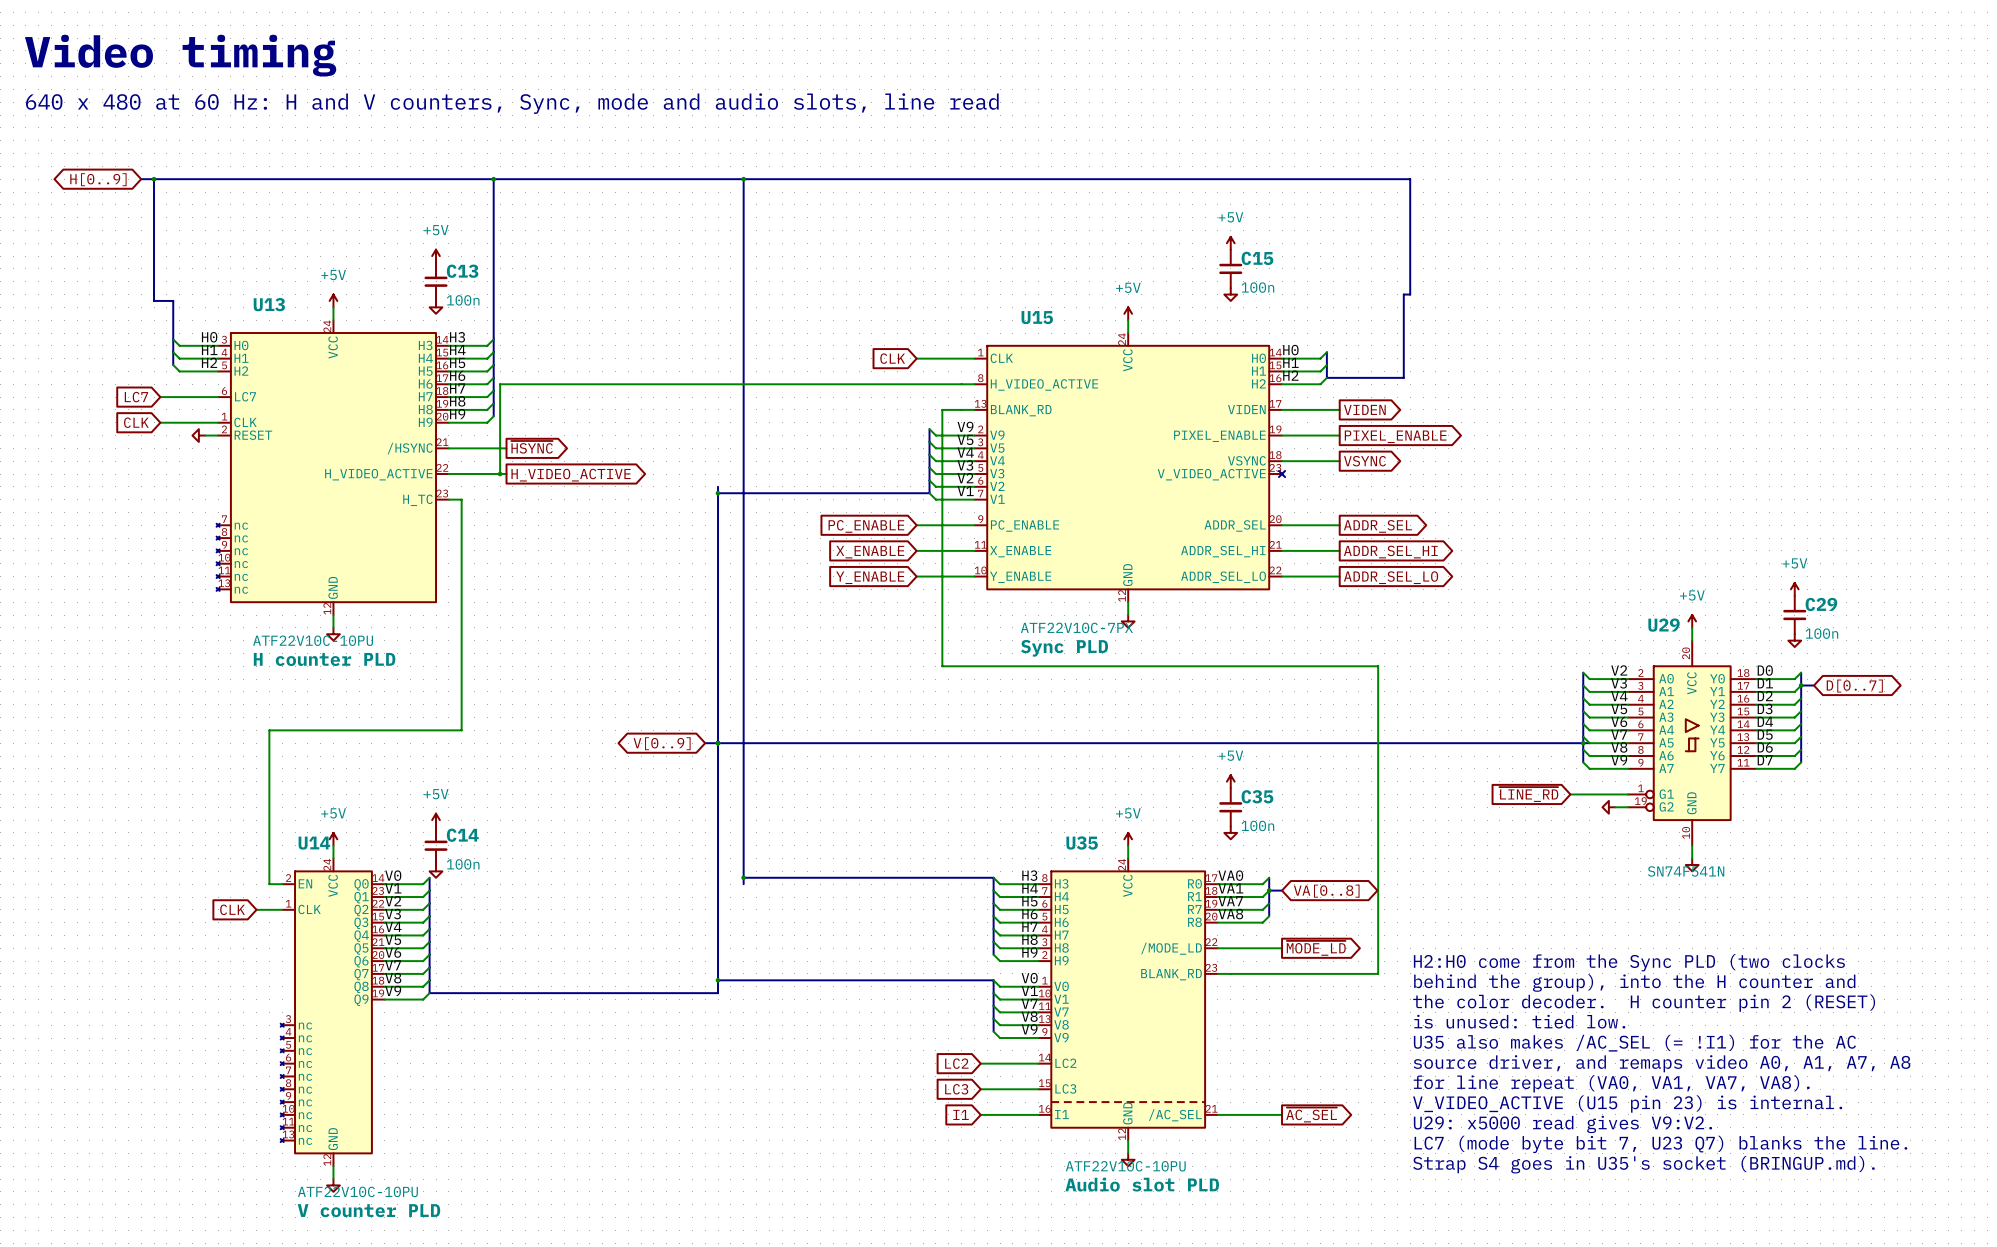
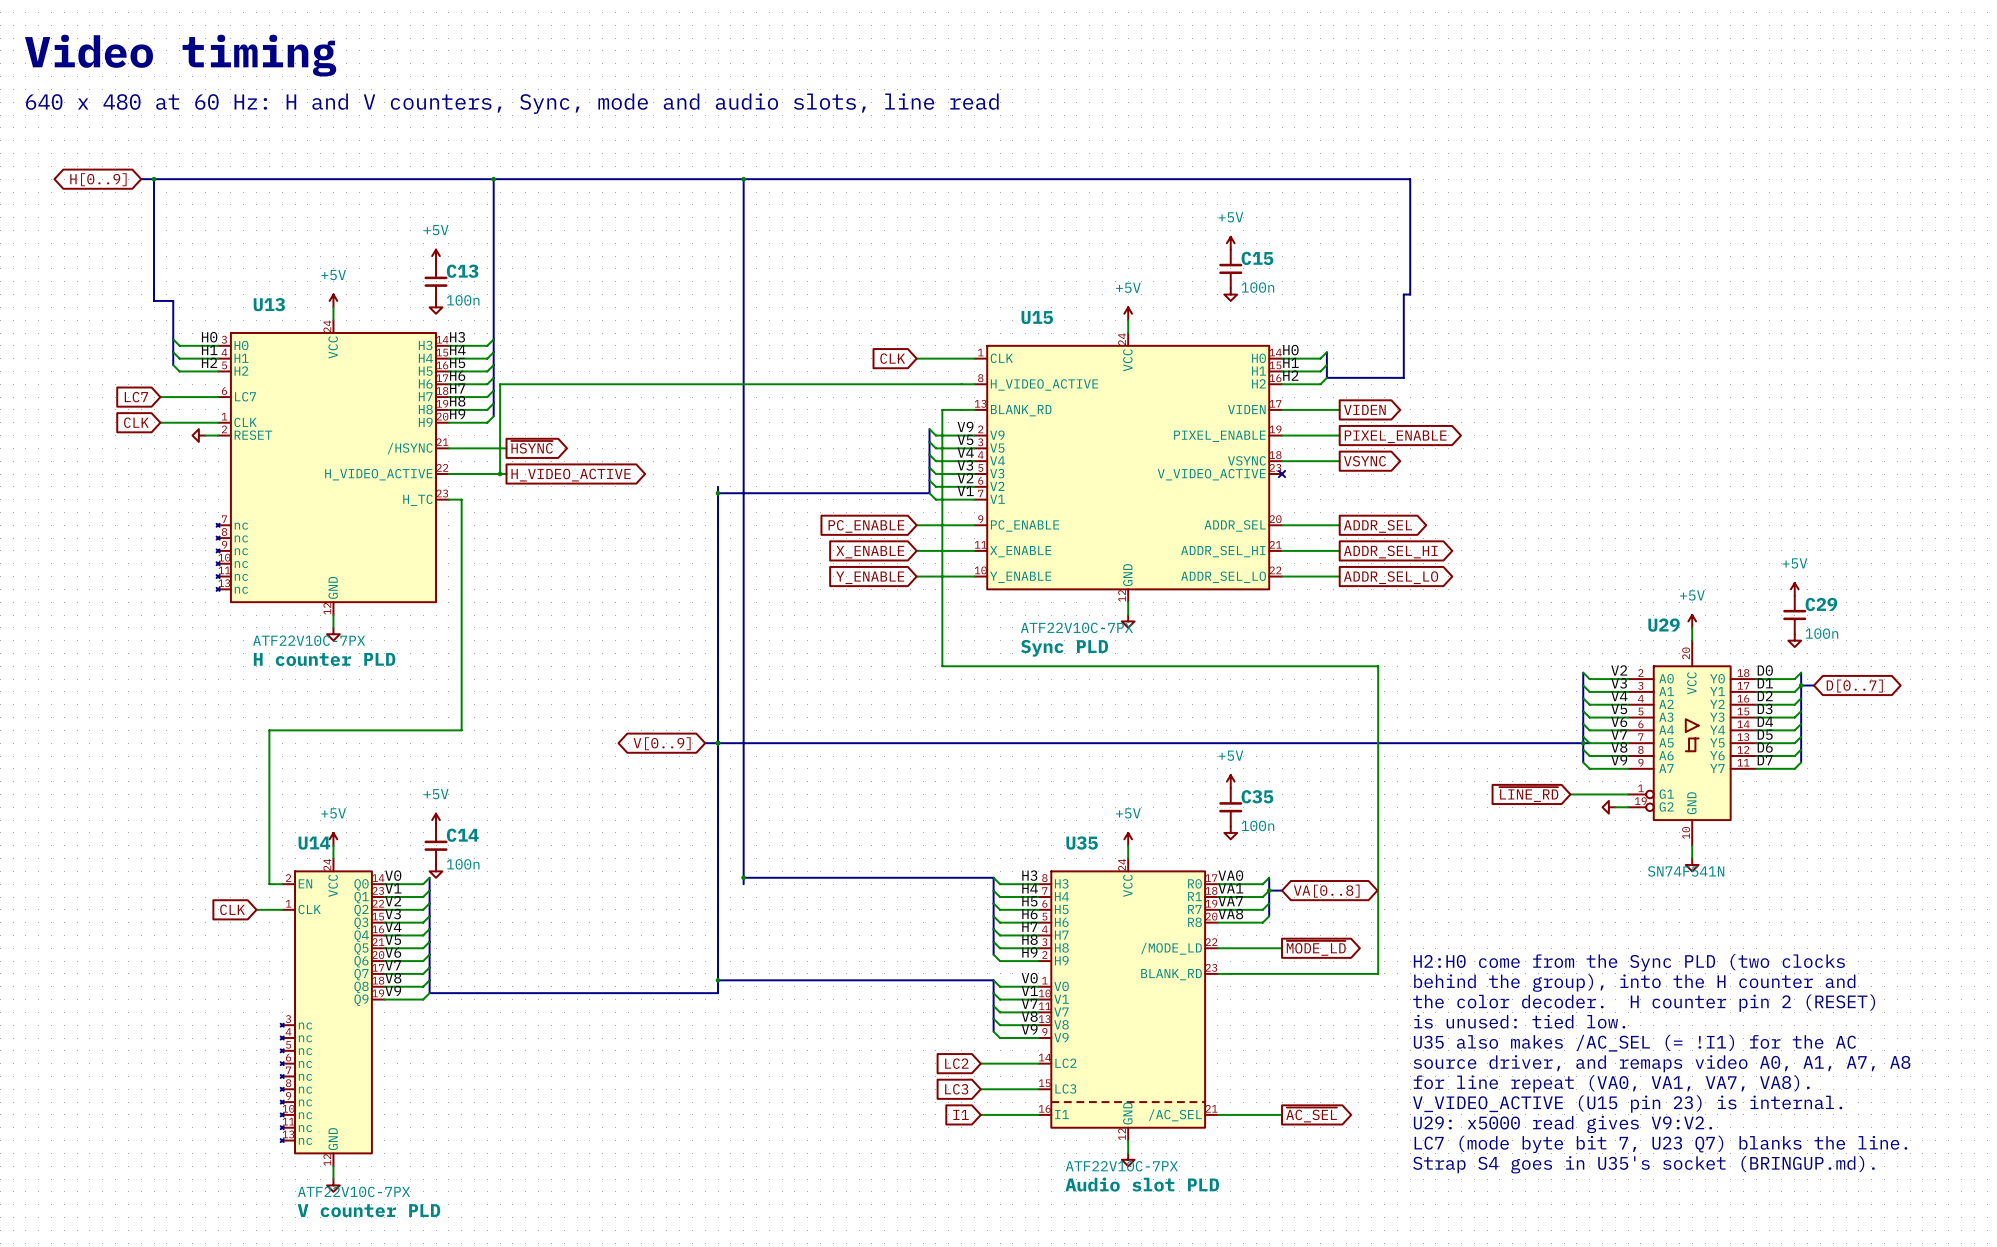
U13 value: ATF22V10C-10PU (313, 640) -> ATF22V10C-7PX (309, 640)
U35 value: ATF22V10C-10PU (1125, 1166) -> ATF22V10C-7PX (1121, 1166)
U14 value: ATF22V10C-10PU (357, 1191) -> ATF22V10C-7PX (354, 1191)

